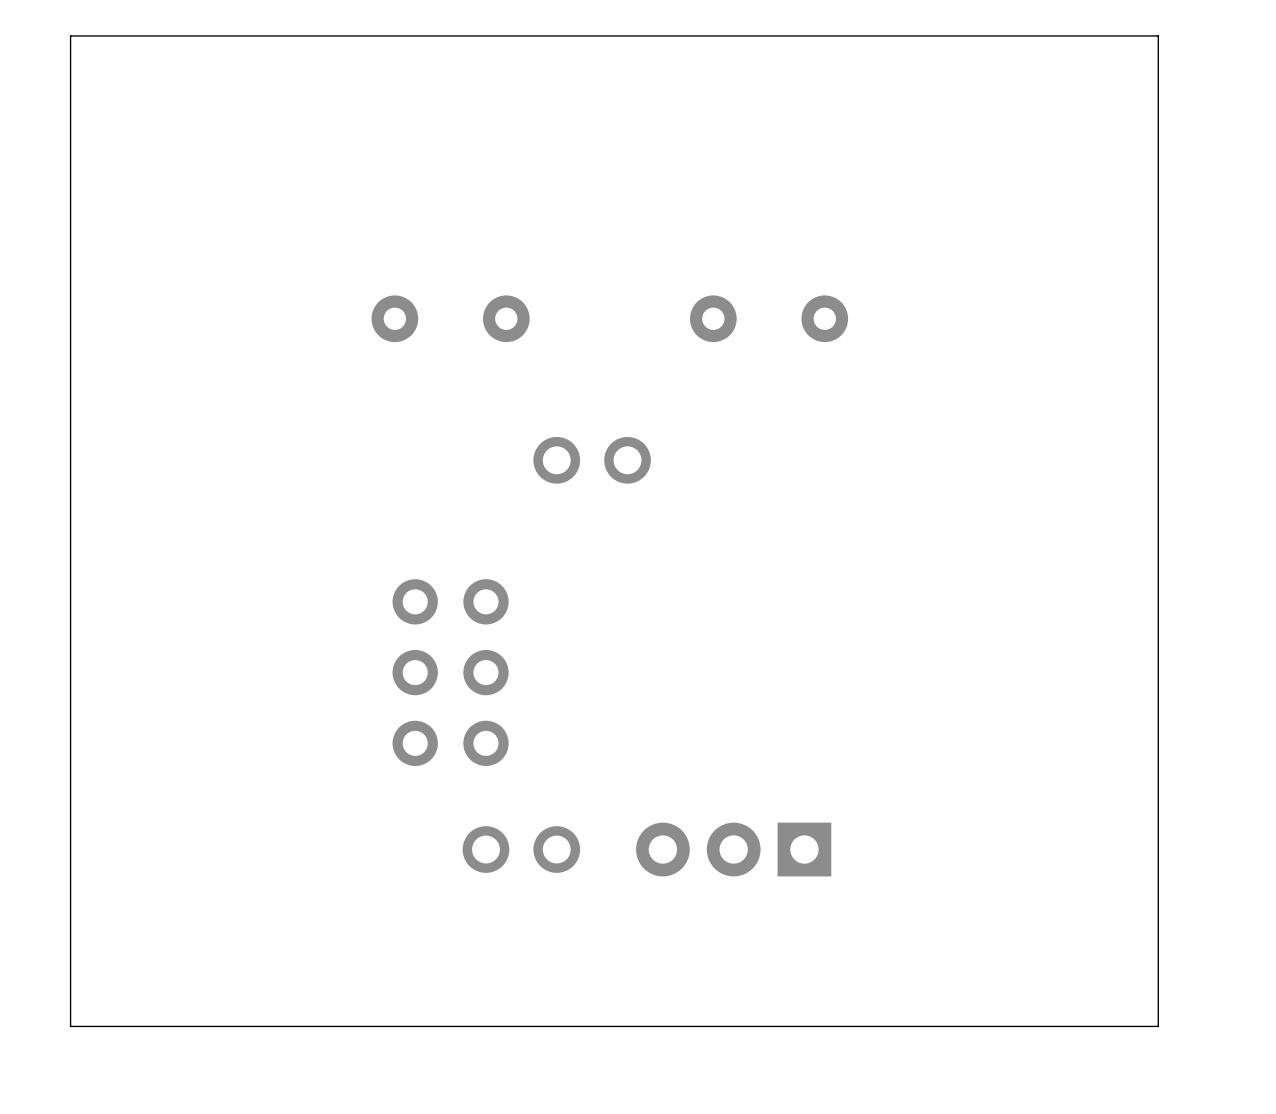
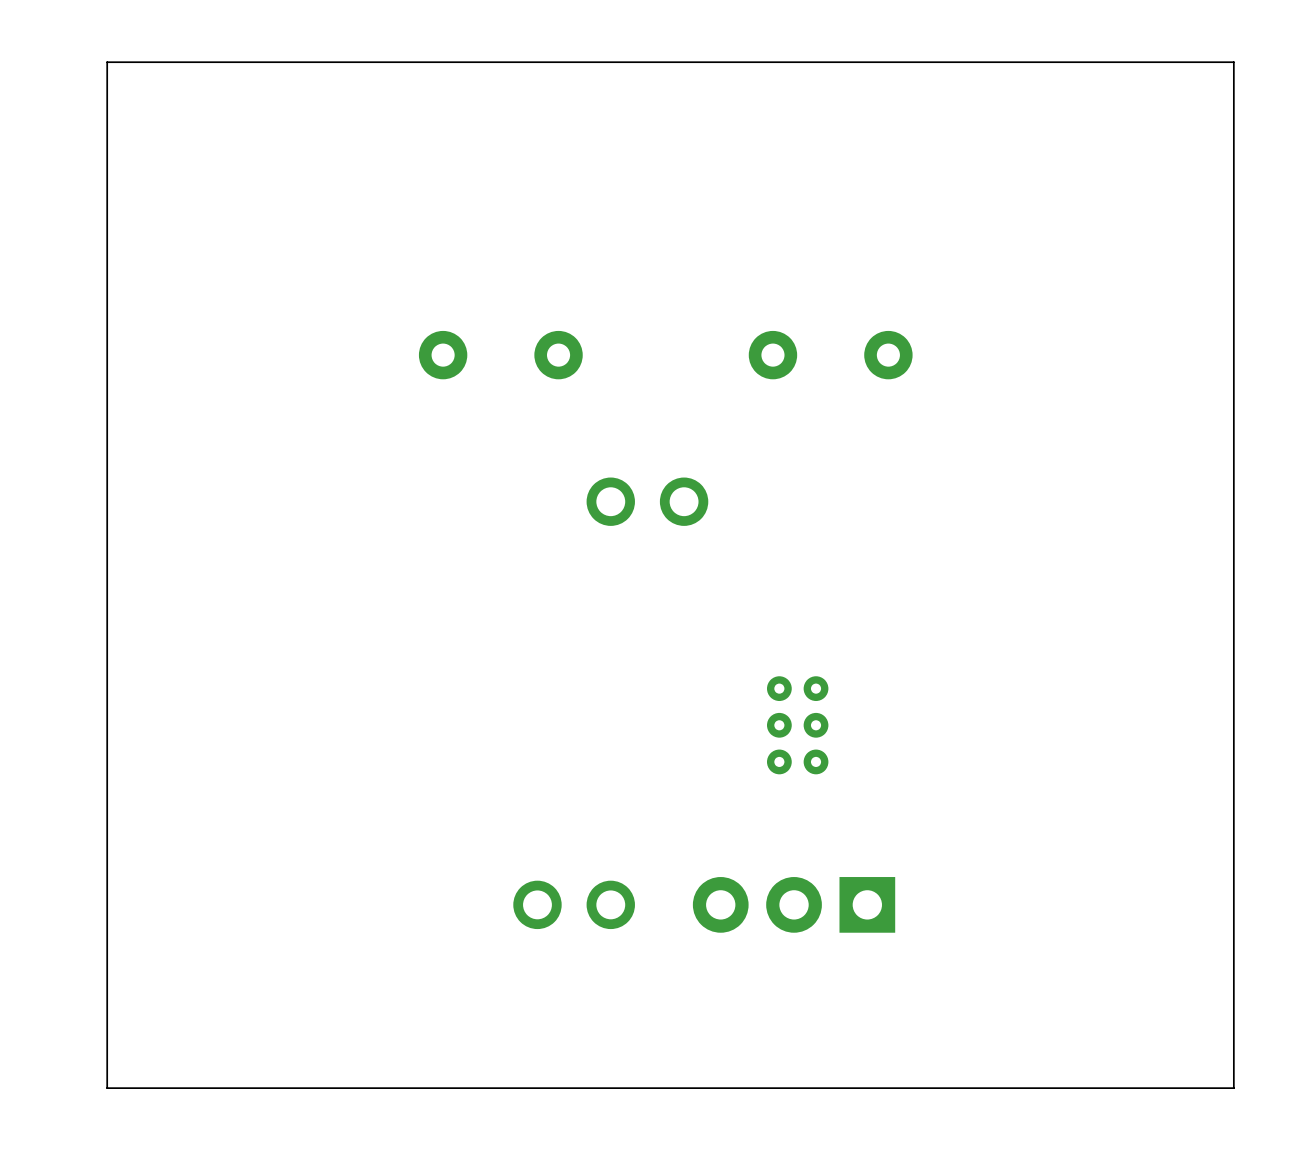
part: (450, 672) -> none
part: none -> (797, 725)

